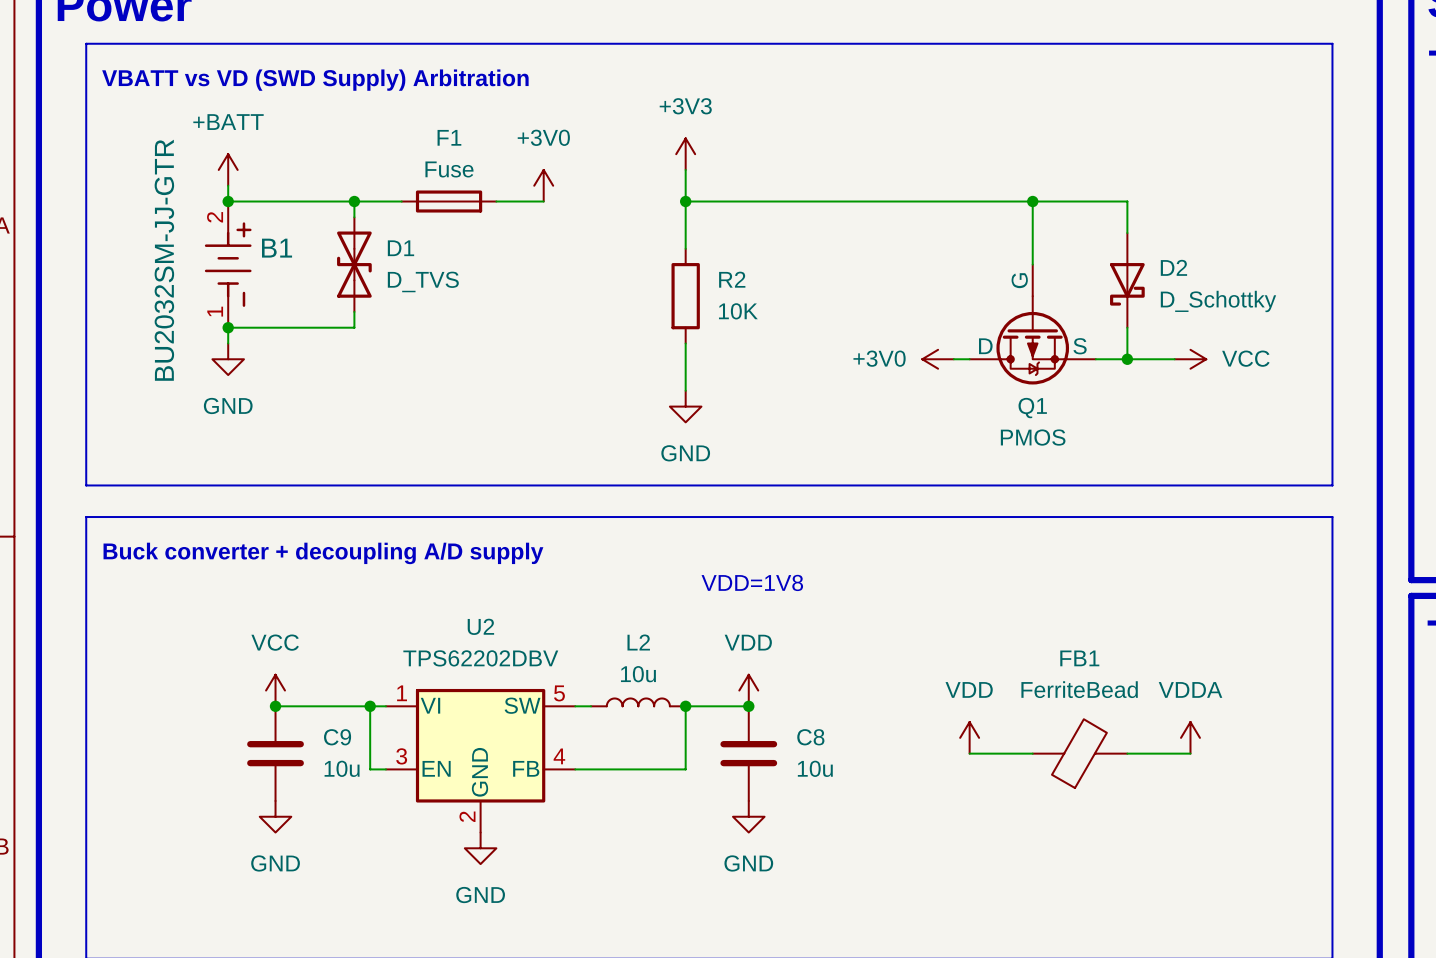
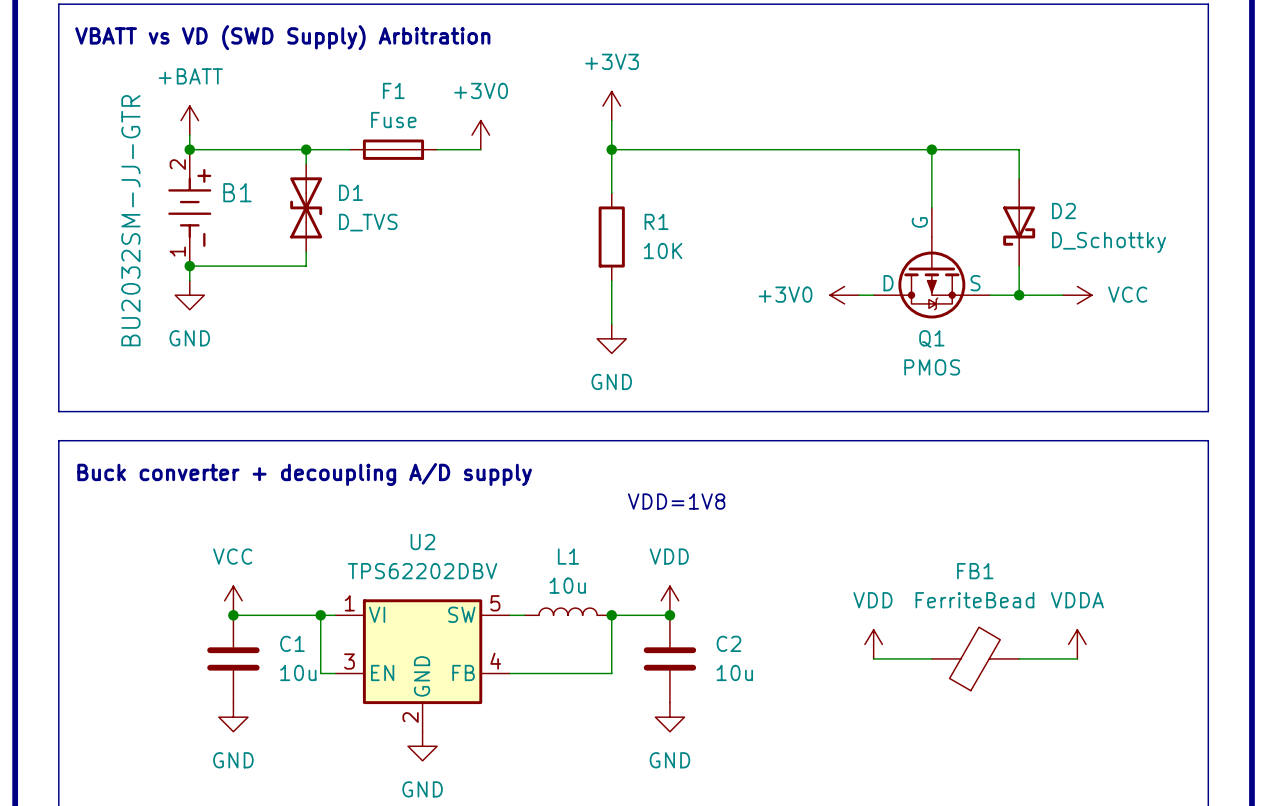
R2 name: R2 (732, 279) -> R1 (656, 221)
L2 name: L2 (638, 642) -> L1 (568, 556)
C9 name: C9 (337, 737) -> C1 (292, 643)
C8 name: C8 (810, 737) -> C2 (728, 643)

